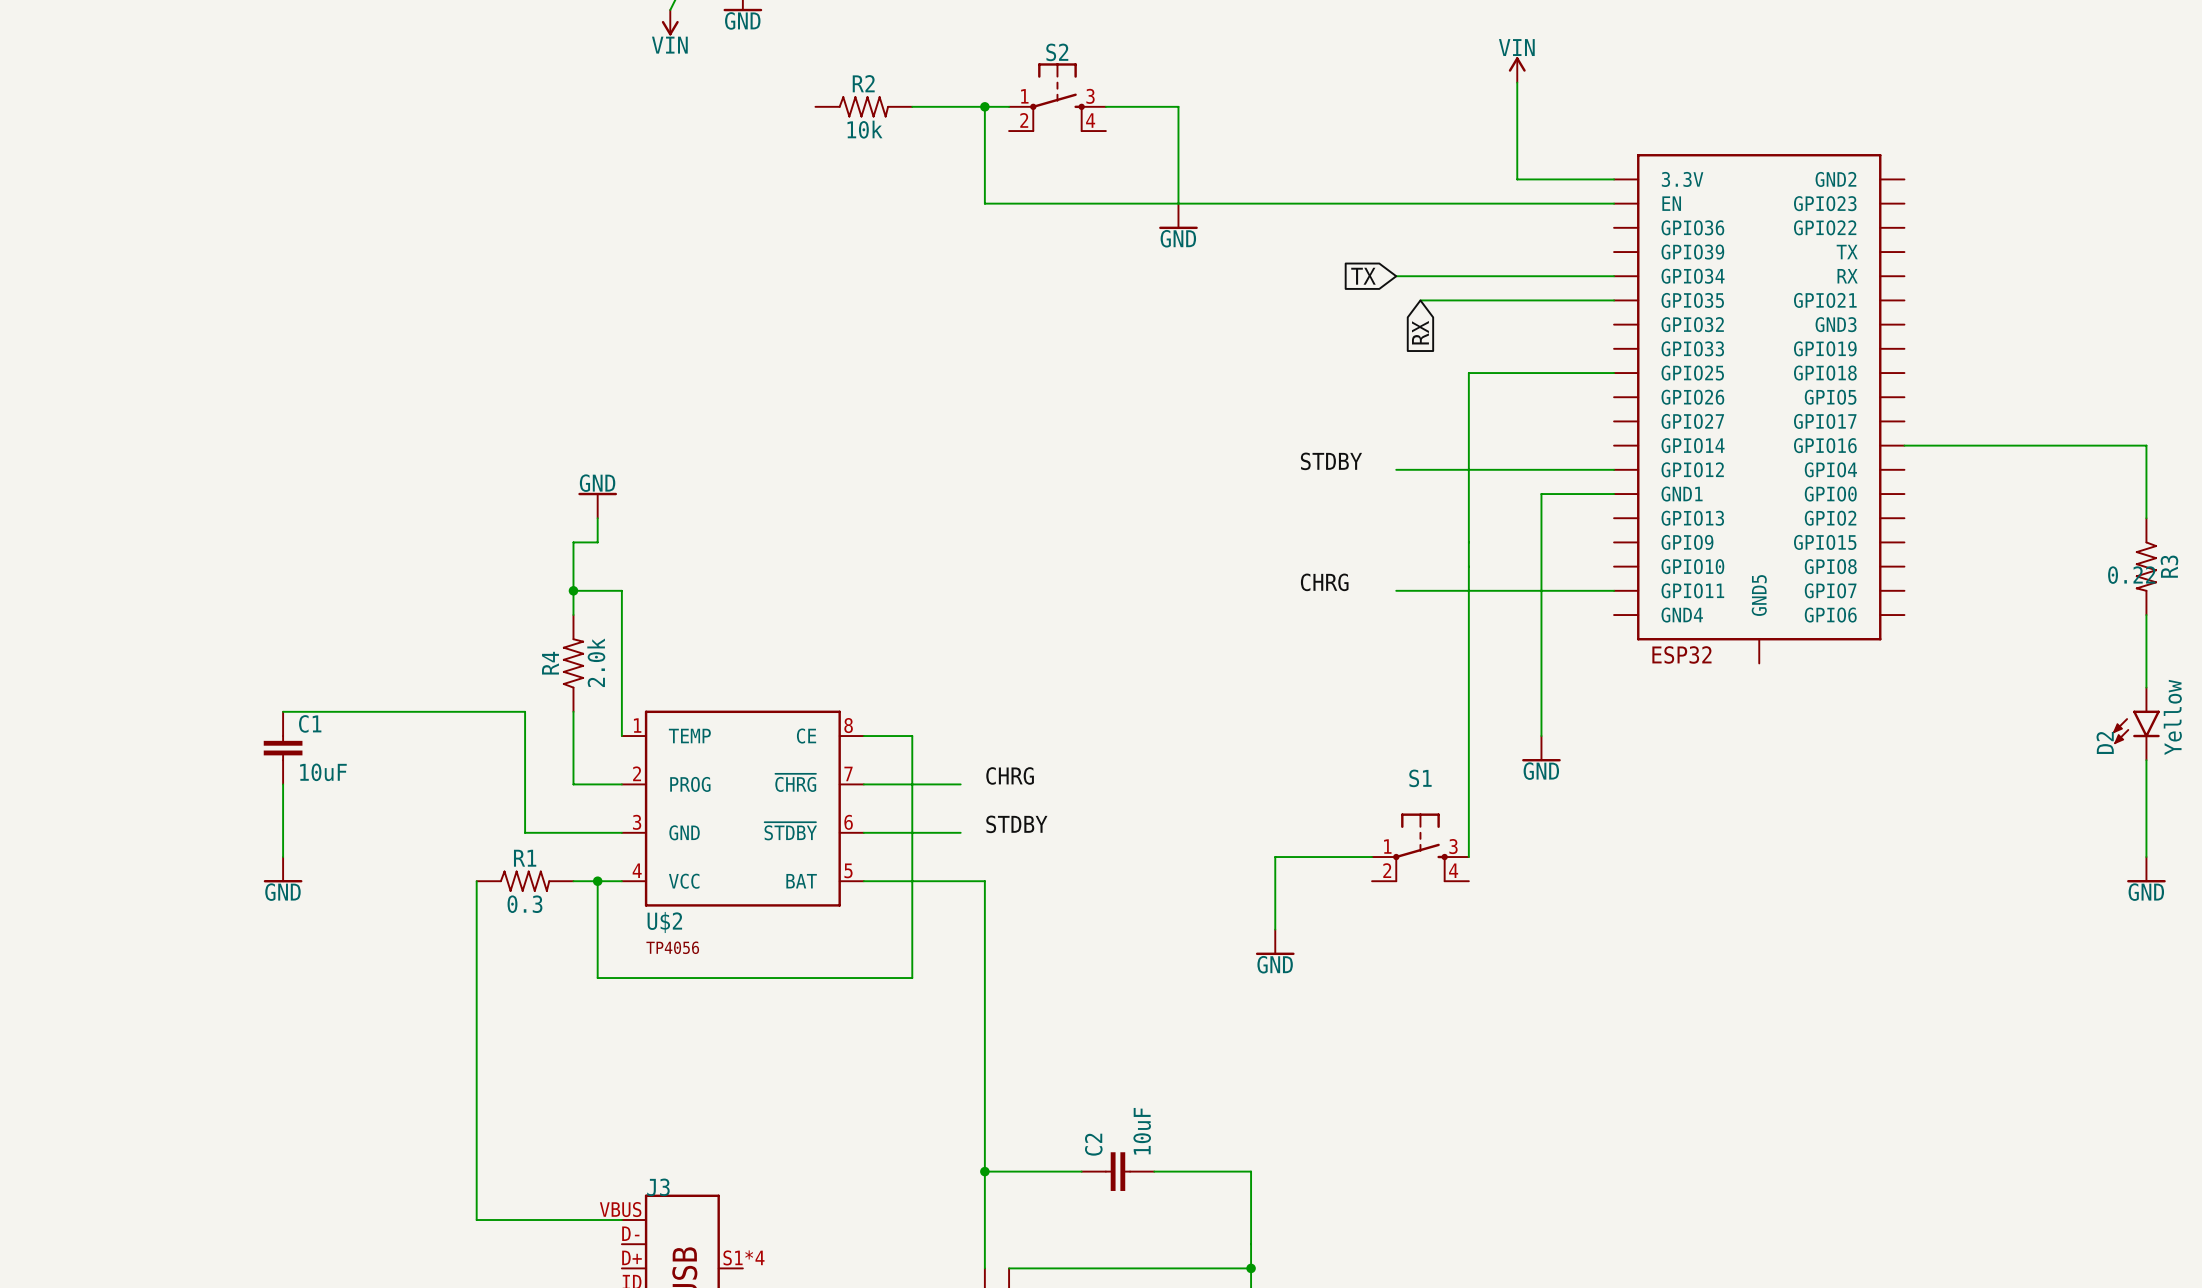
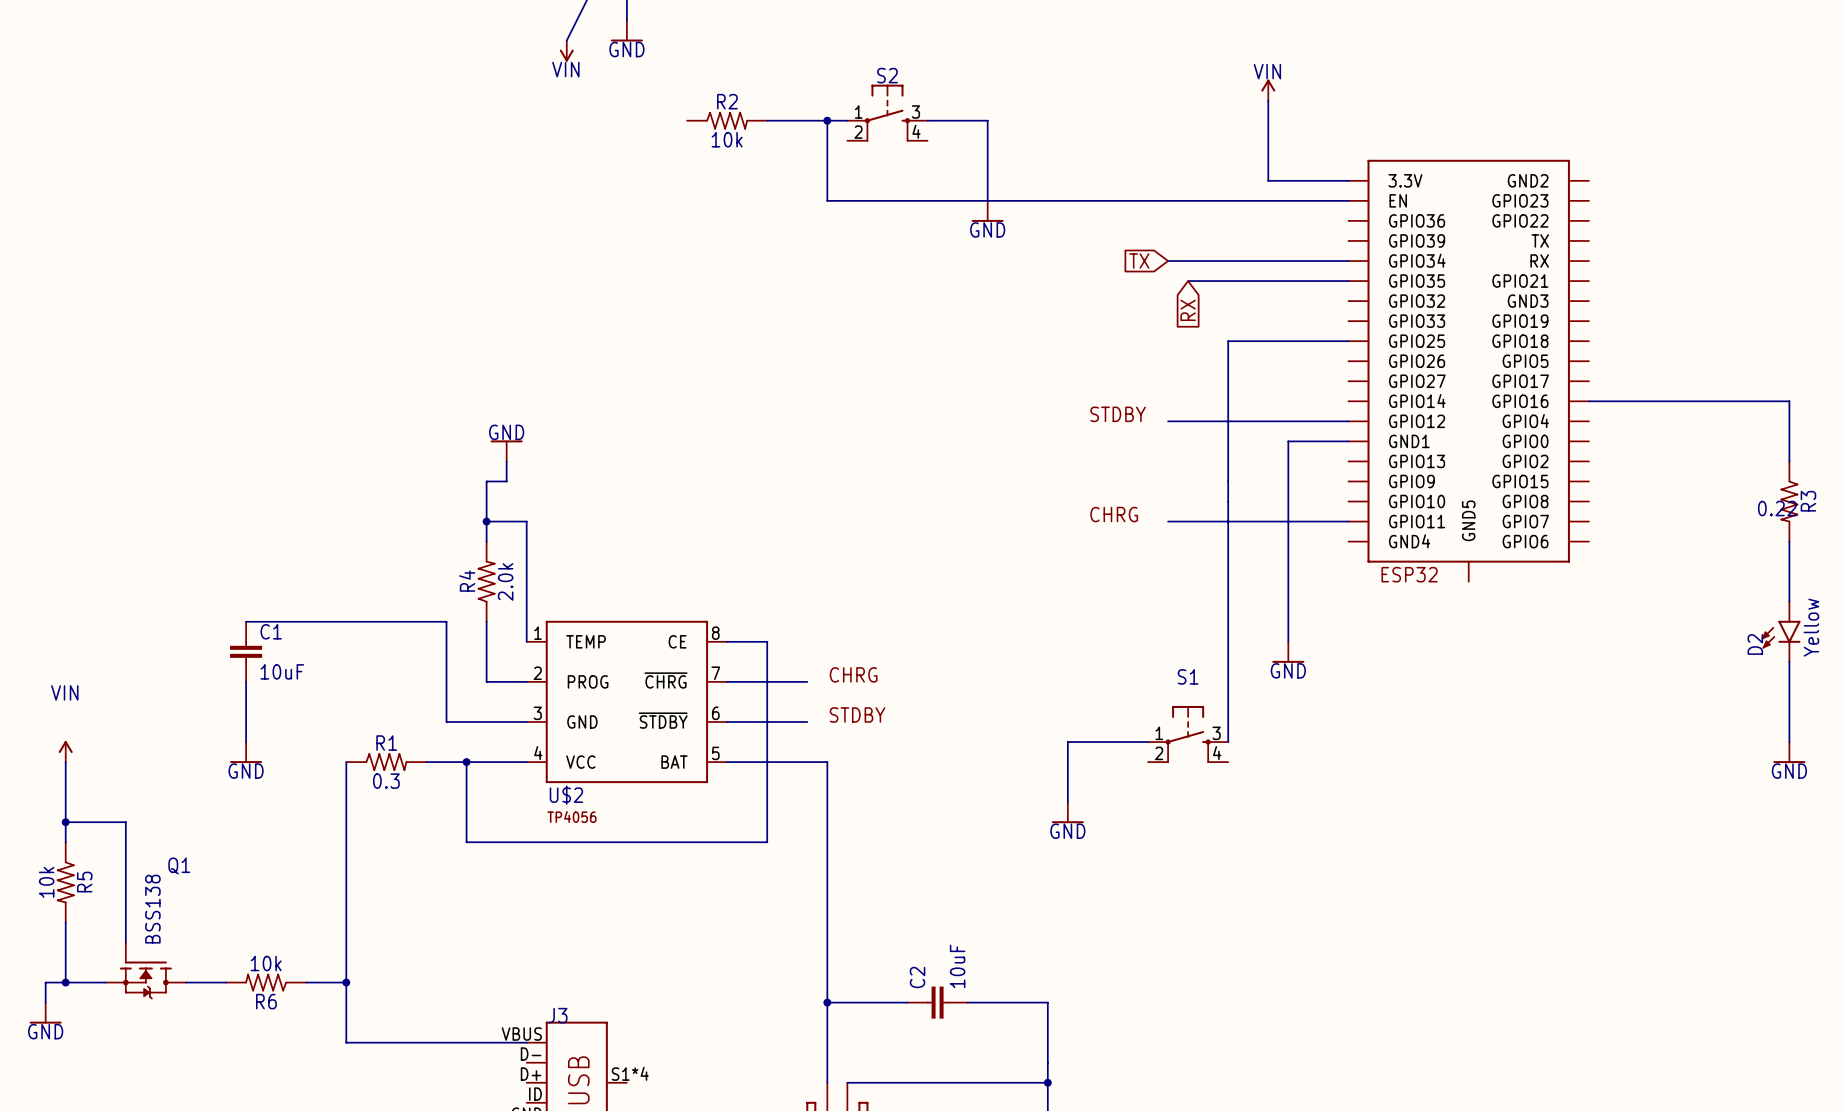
power symbol: none -> VIN (65, 751)
wire: none -> (65, 762) (65, 842)
wire: (476, 881) (476, 1220) -> (346, 762) (346, 1042) (406, 1042)
R1 position: (525, 881) -> (386, 762)
wire: (597, 881) (597, 978) -> (466, 762) (466, 842) (506, 842)
junction position: (597, 881) -> (466, 762)
wire: none -> (65, 822) (125, 822) (125, 942)
junction: none -> (65, 822)
R5: none -> 10k (65, 882)
wire: none -> (65, 922) (65, 982)
Q1: none -> BSS138 (145, 970)
junction: none -> (65, 982)
wire: none -> (105, 982) (45, 982) (45, 1002)
wire: none -> (185, 982) (226, 982)
R6: none -> 10k (266, 982)
wire: none -> (306, 982) (346, 982)
junction: none -> (346, 982)
power symbol: none -> GND (45, 1013)

